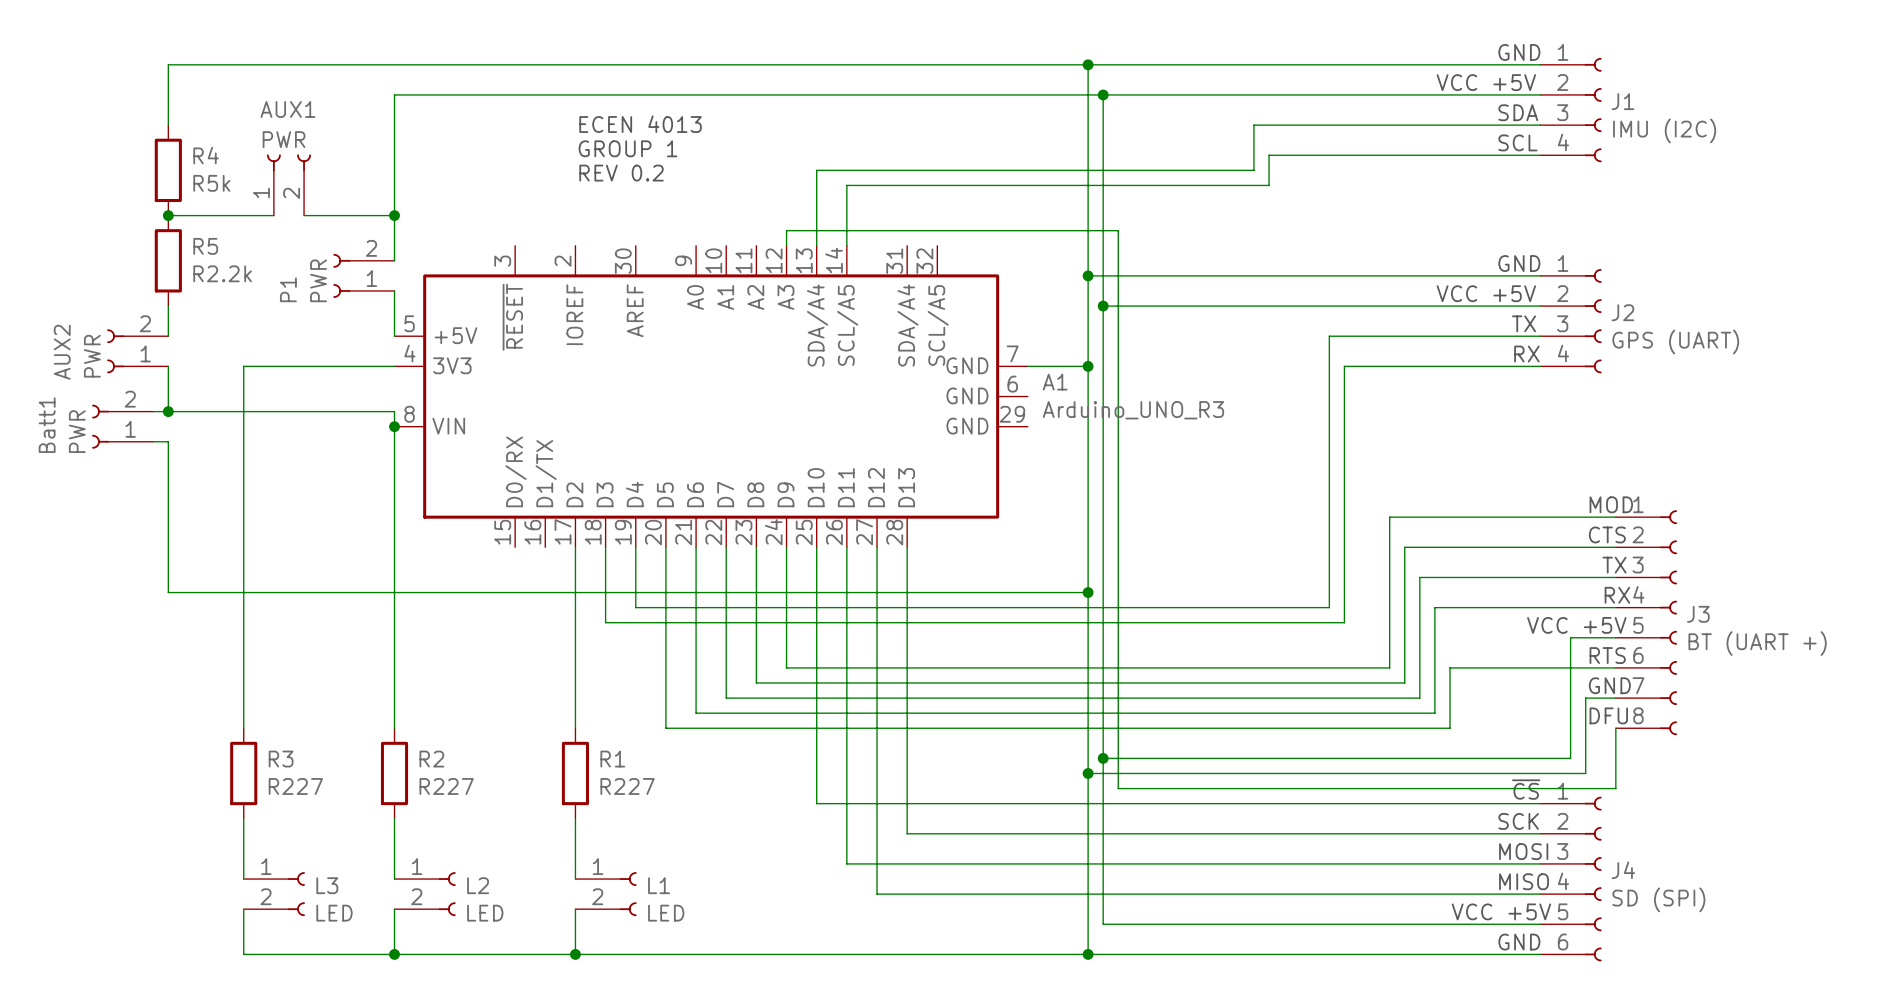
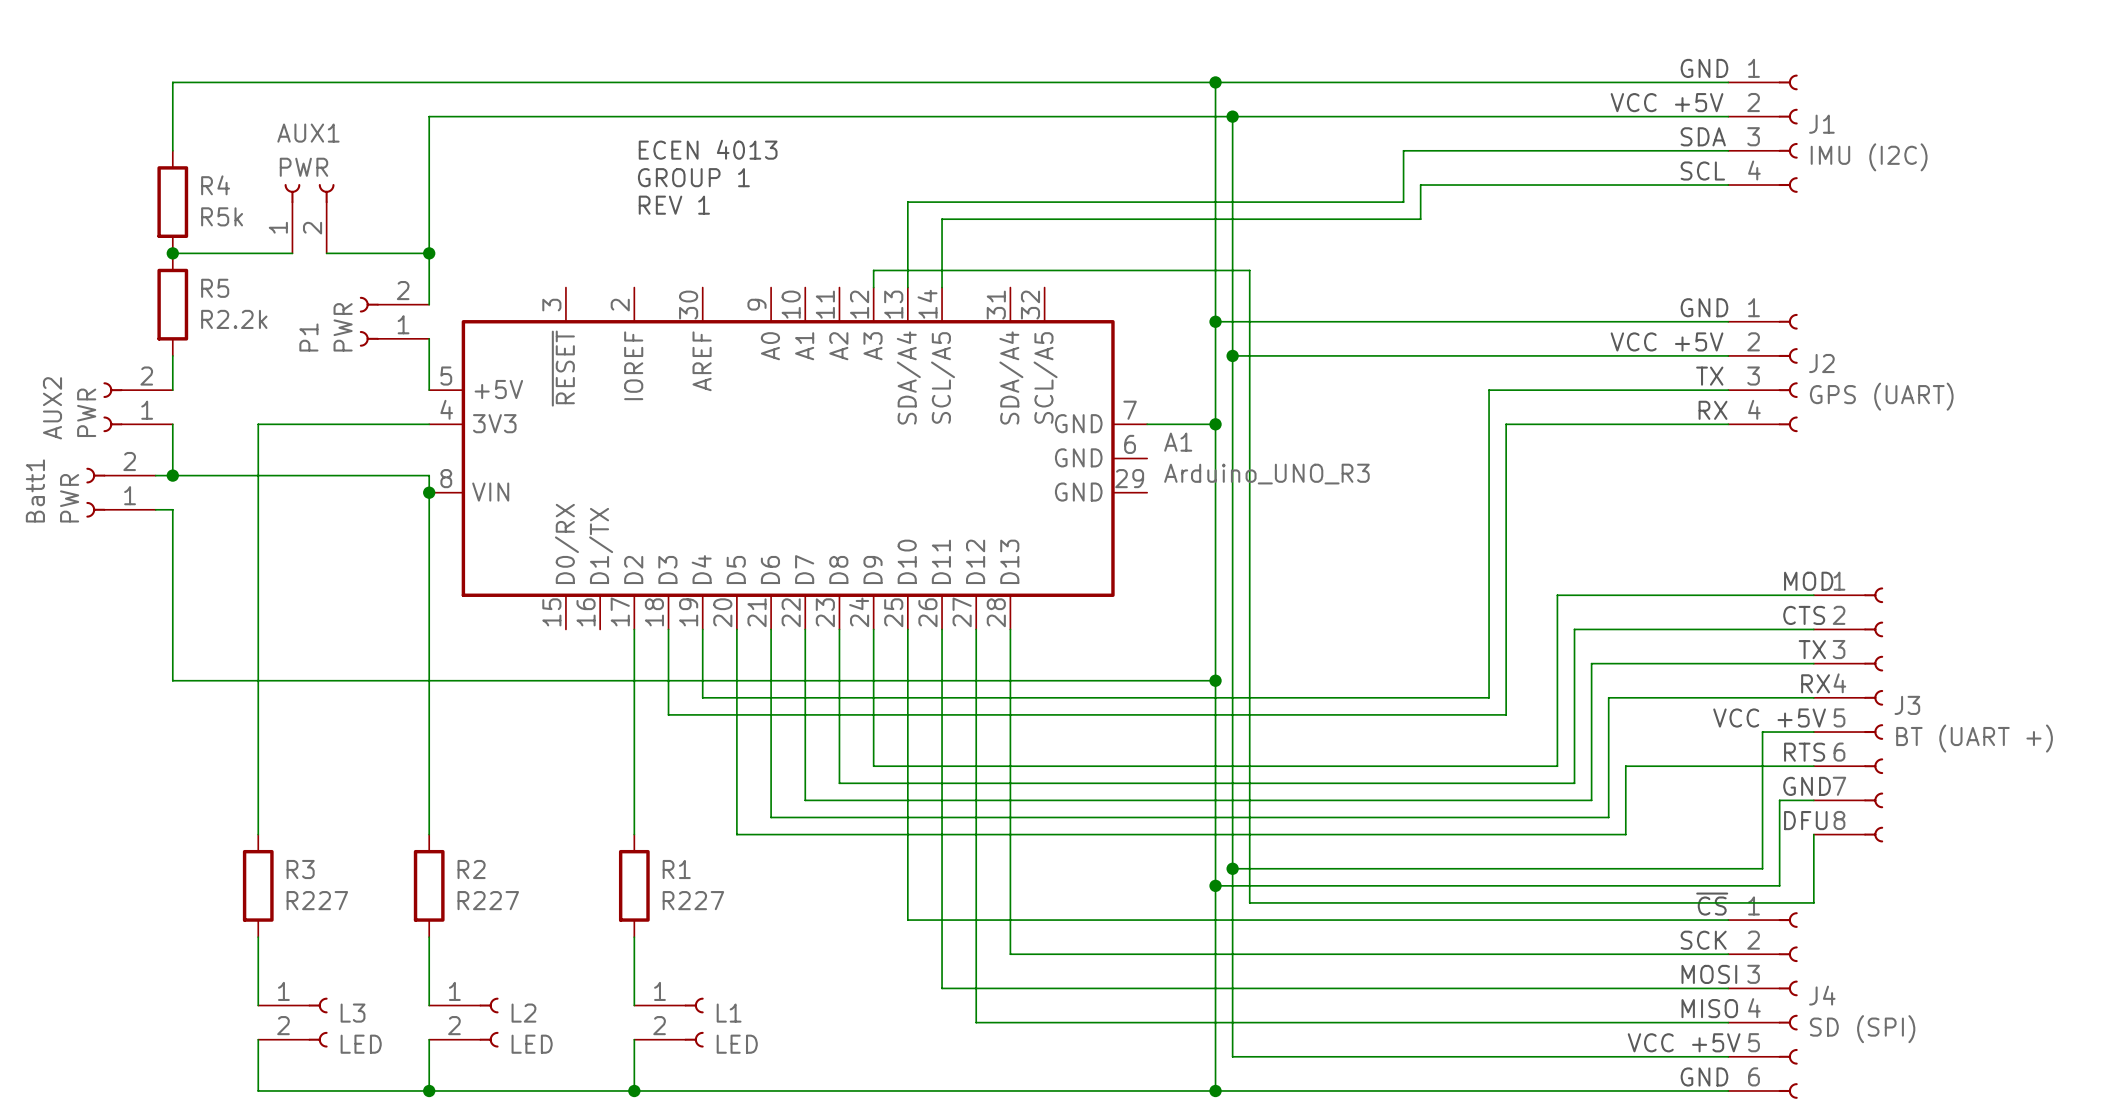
text: REV 0.2 (621, 173) -> REV 1 (674, 205)

